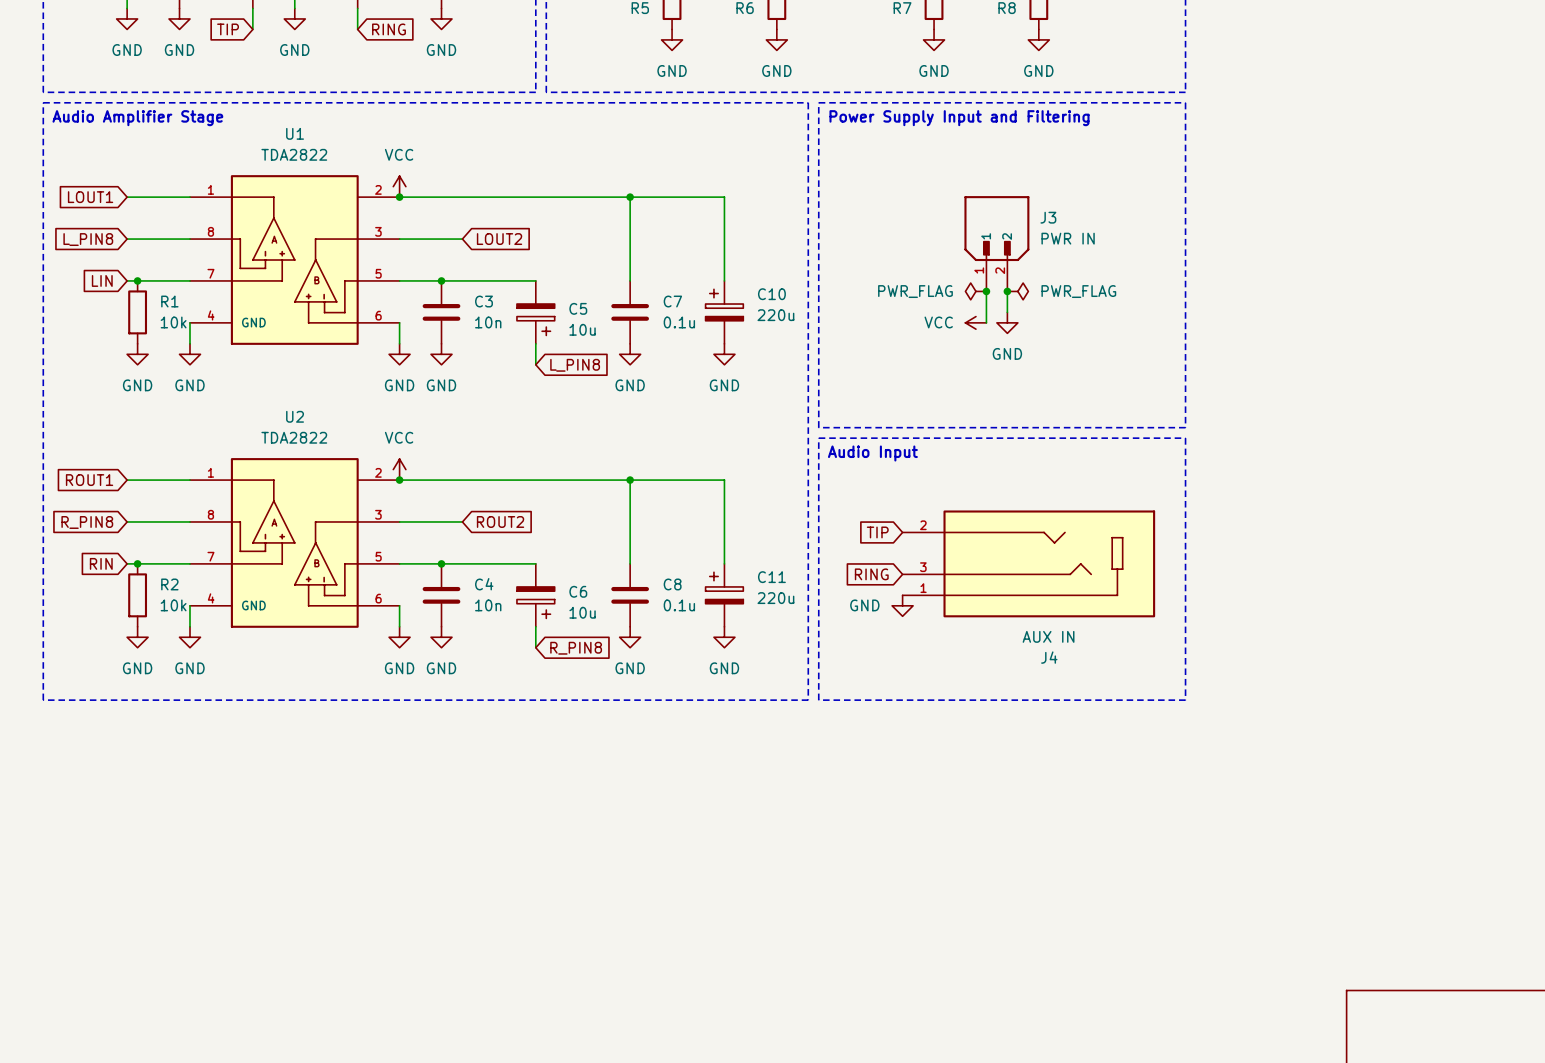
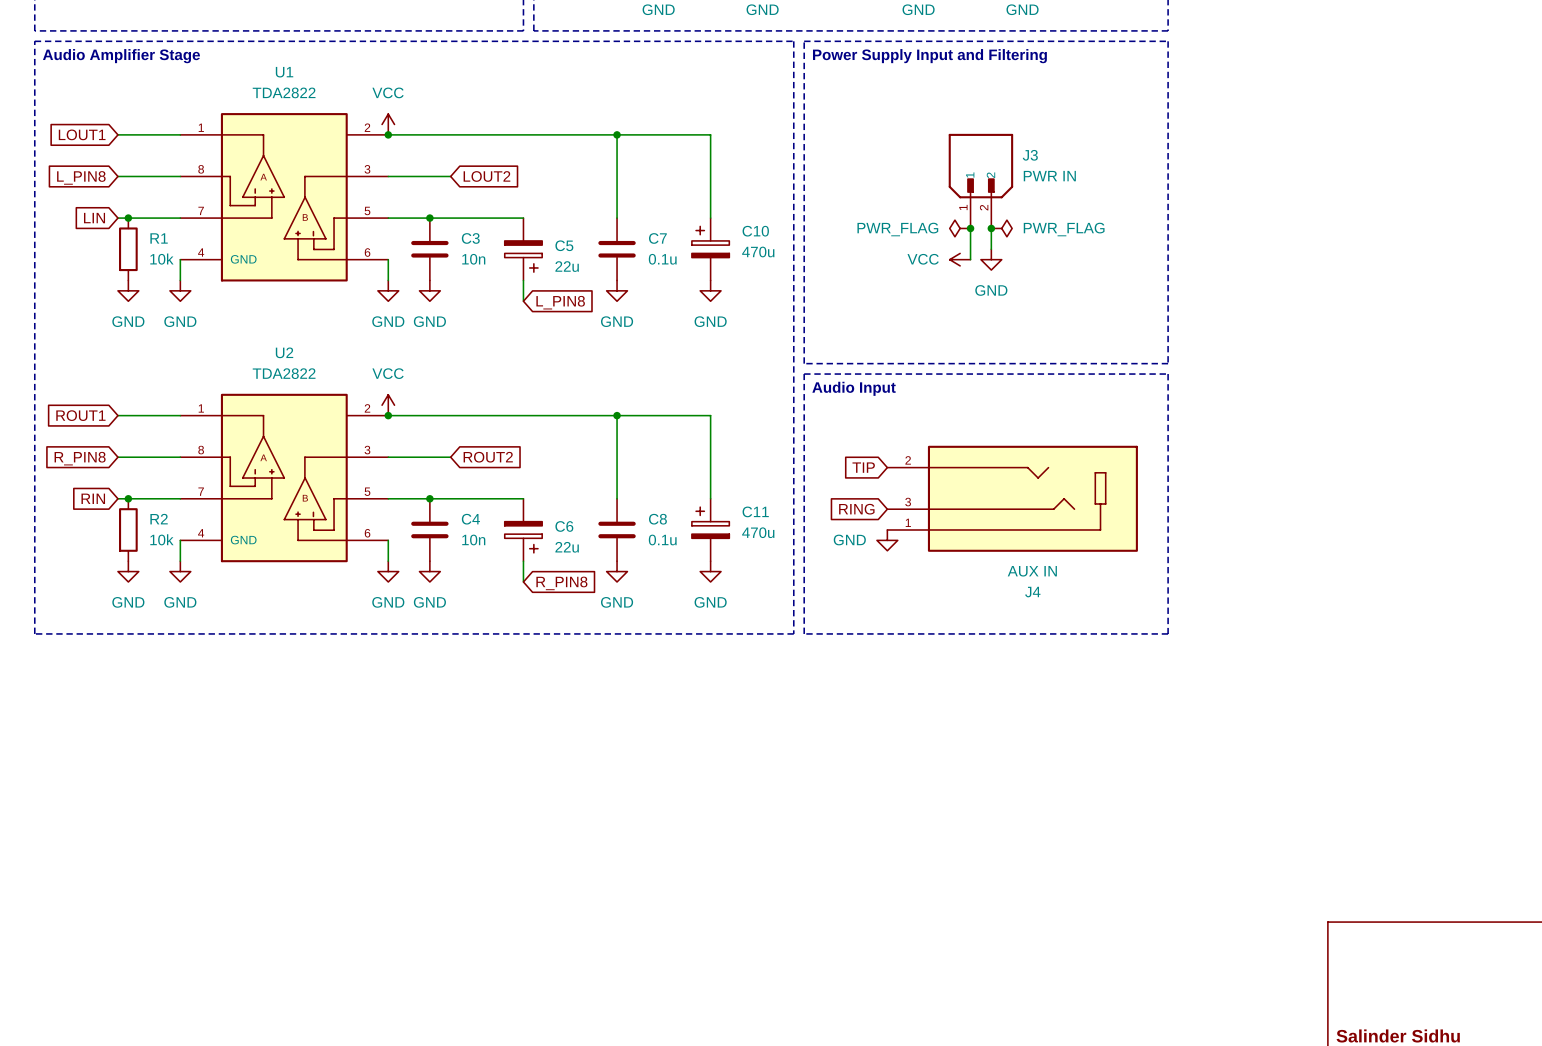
C10 value: 220u (775, 315) -> 470u (758, 251)
C5 value: 10u (582, 329) -> 22u (567, 266)
C11 value: 220u (775, 598) -> 470u (758, 532)
C6 value: 10u (582, 612) -> 22u (567, 547)

